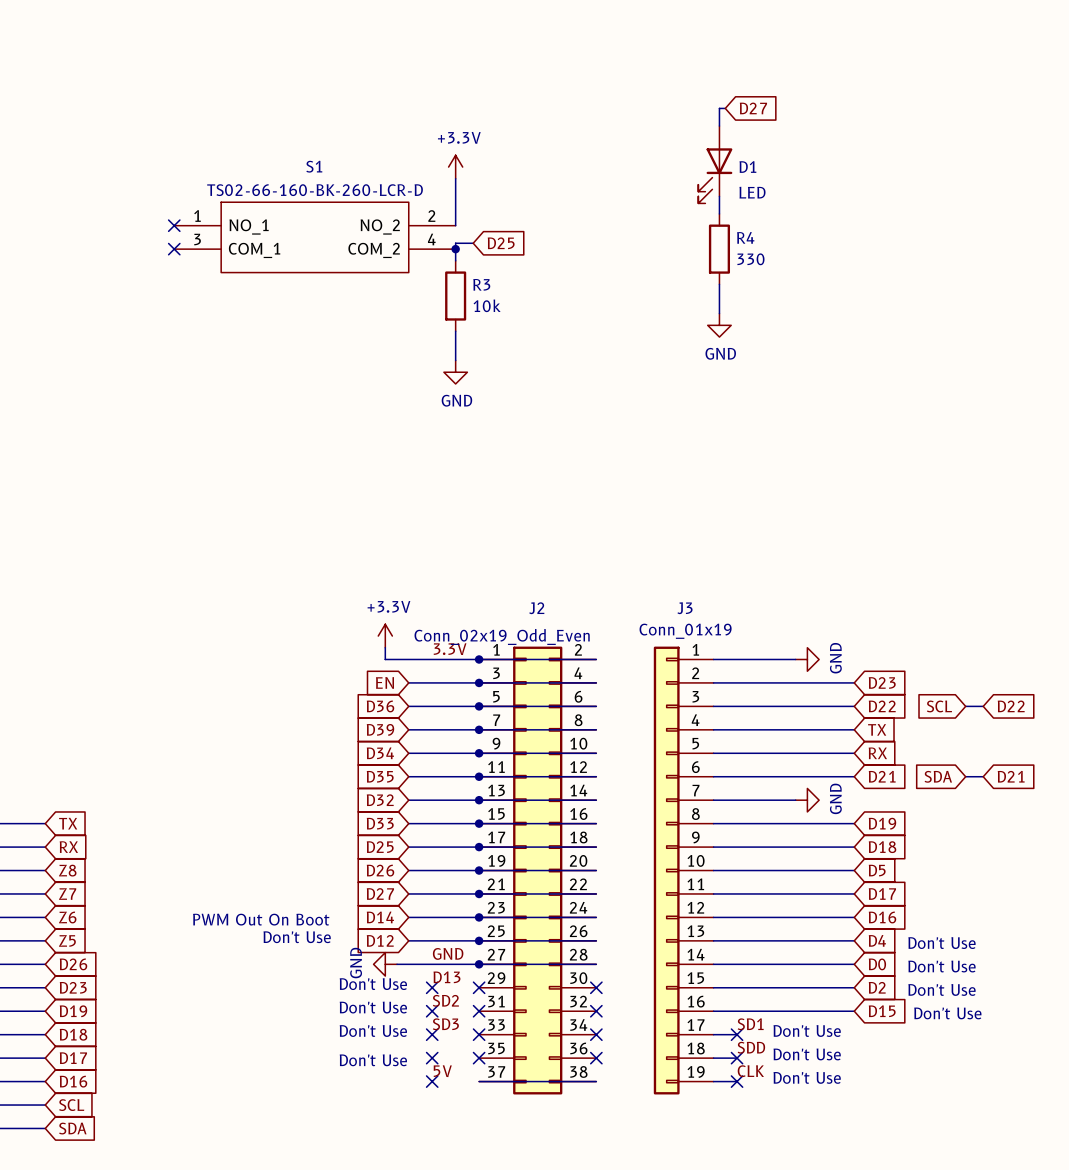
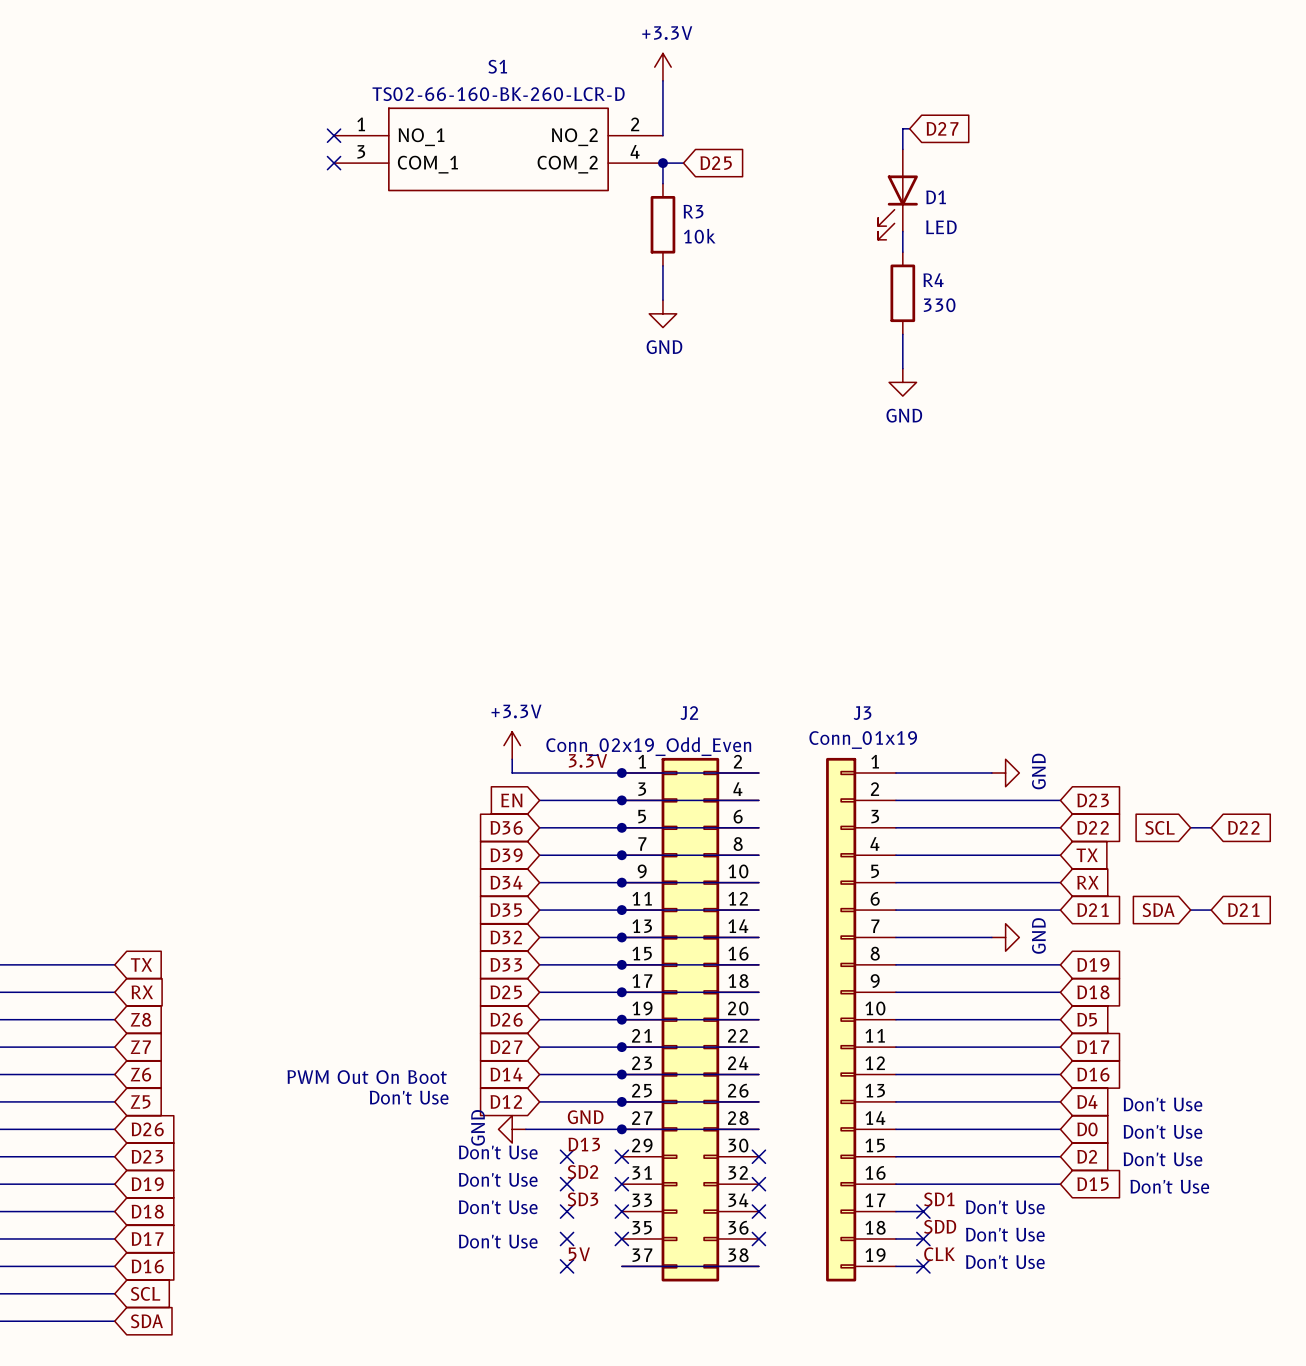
no-connect mark: none -> (334, 135)
no-connect mark: none -> (334, 163)
junction: none -> (662, 163)
power symbol position: +3.3V (455, 167) -> +3.3V (662, 67)
wire: (455, 178) (455, 225) -> (662, 80) (662, 135)
no-connect mark: (174, 225) -> none
S1 position: (314, 237) -> (498, 149)
wire: (473, 243) (455, 243) (455, 260) -> (683, 163) (662, 163) (662, 183)
global label position: D25 (501, 243) -> D25 (716, 163)
no-connect mark: (174, 249) -> none
junction: (455, 249) -> none
R3 position: (455, 296) -> (662, 224)
wire: (455, 331) (455, 360) -> (662, 265) (662, 300)
power symbol position: GND (455, 372) -> GND (662, 313)

